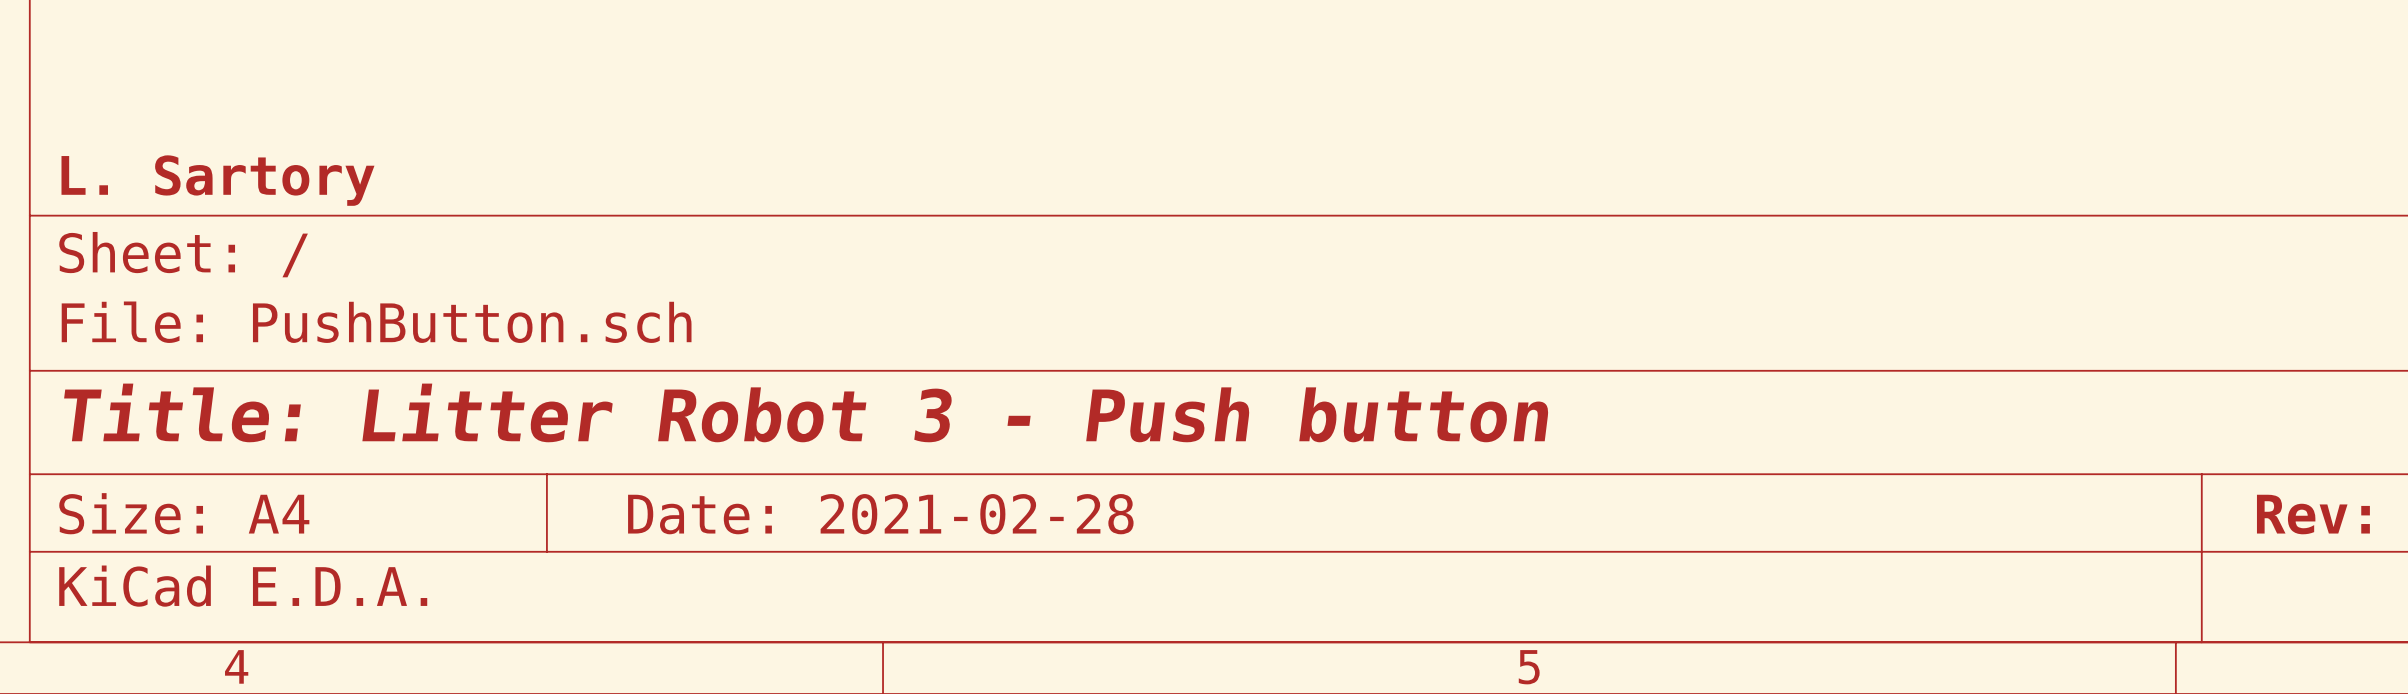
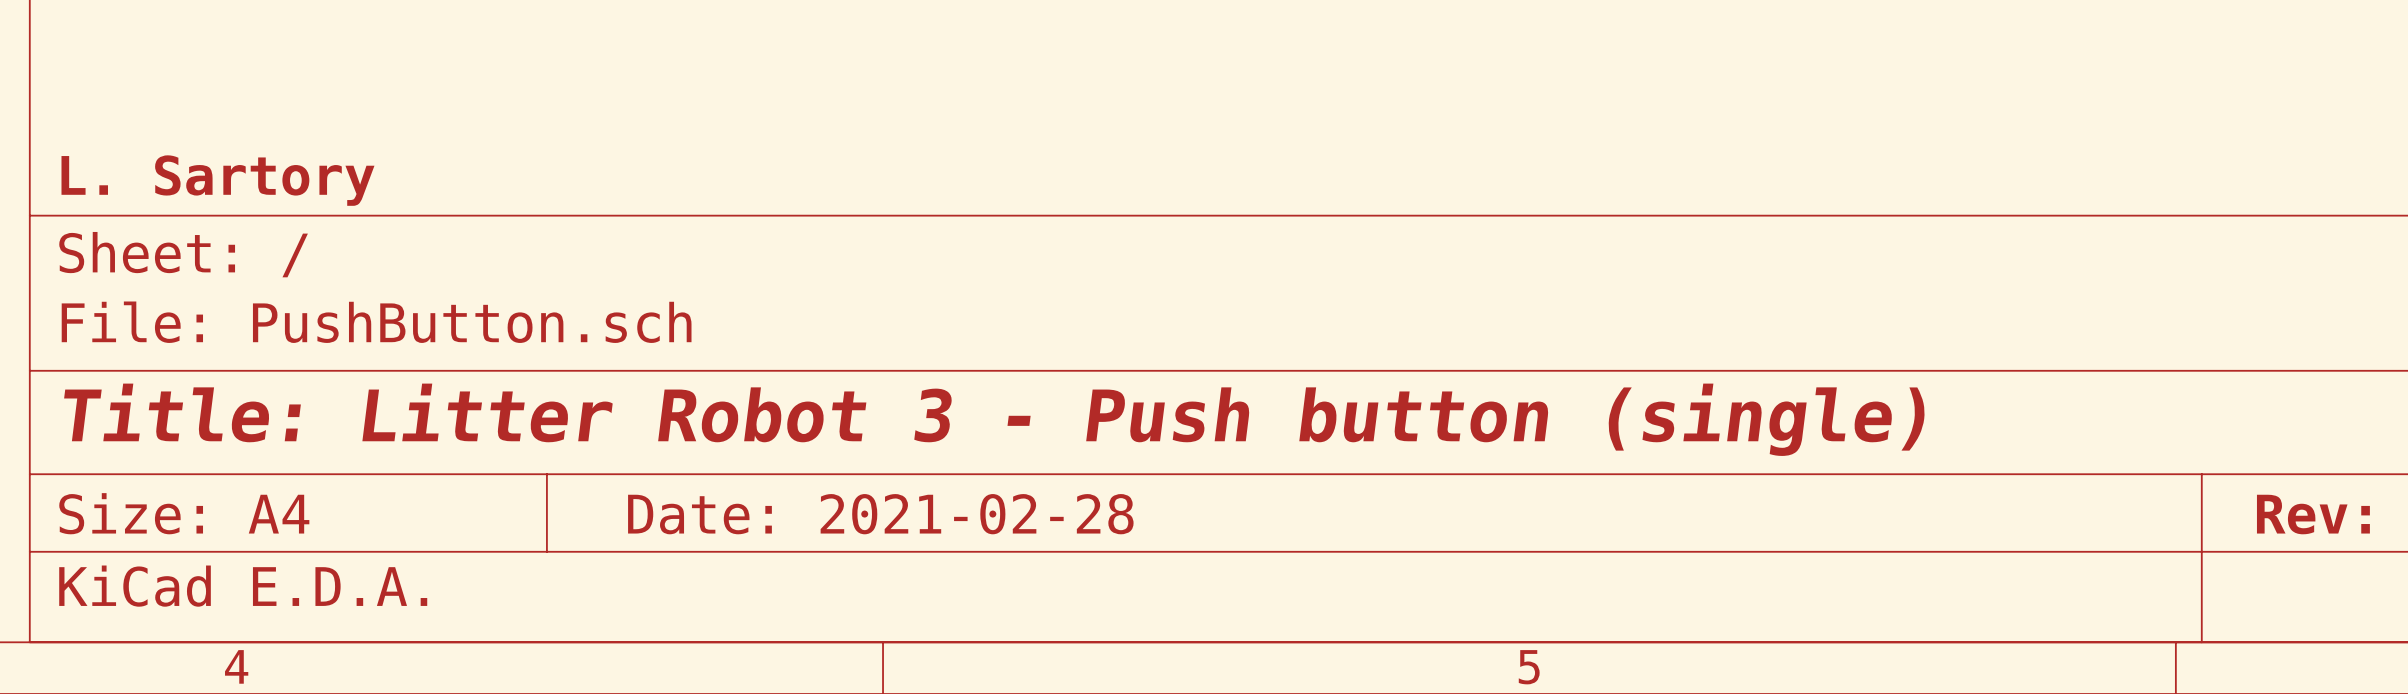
title block: Title: Litter Robot 3 - Push button (806, 412) -> Title: Litter Robot 3 - Push button (single) (994, 419)

